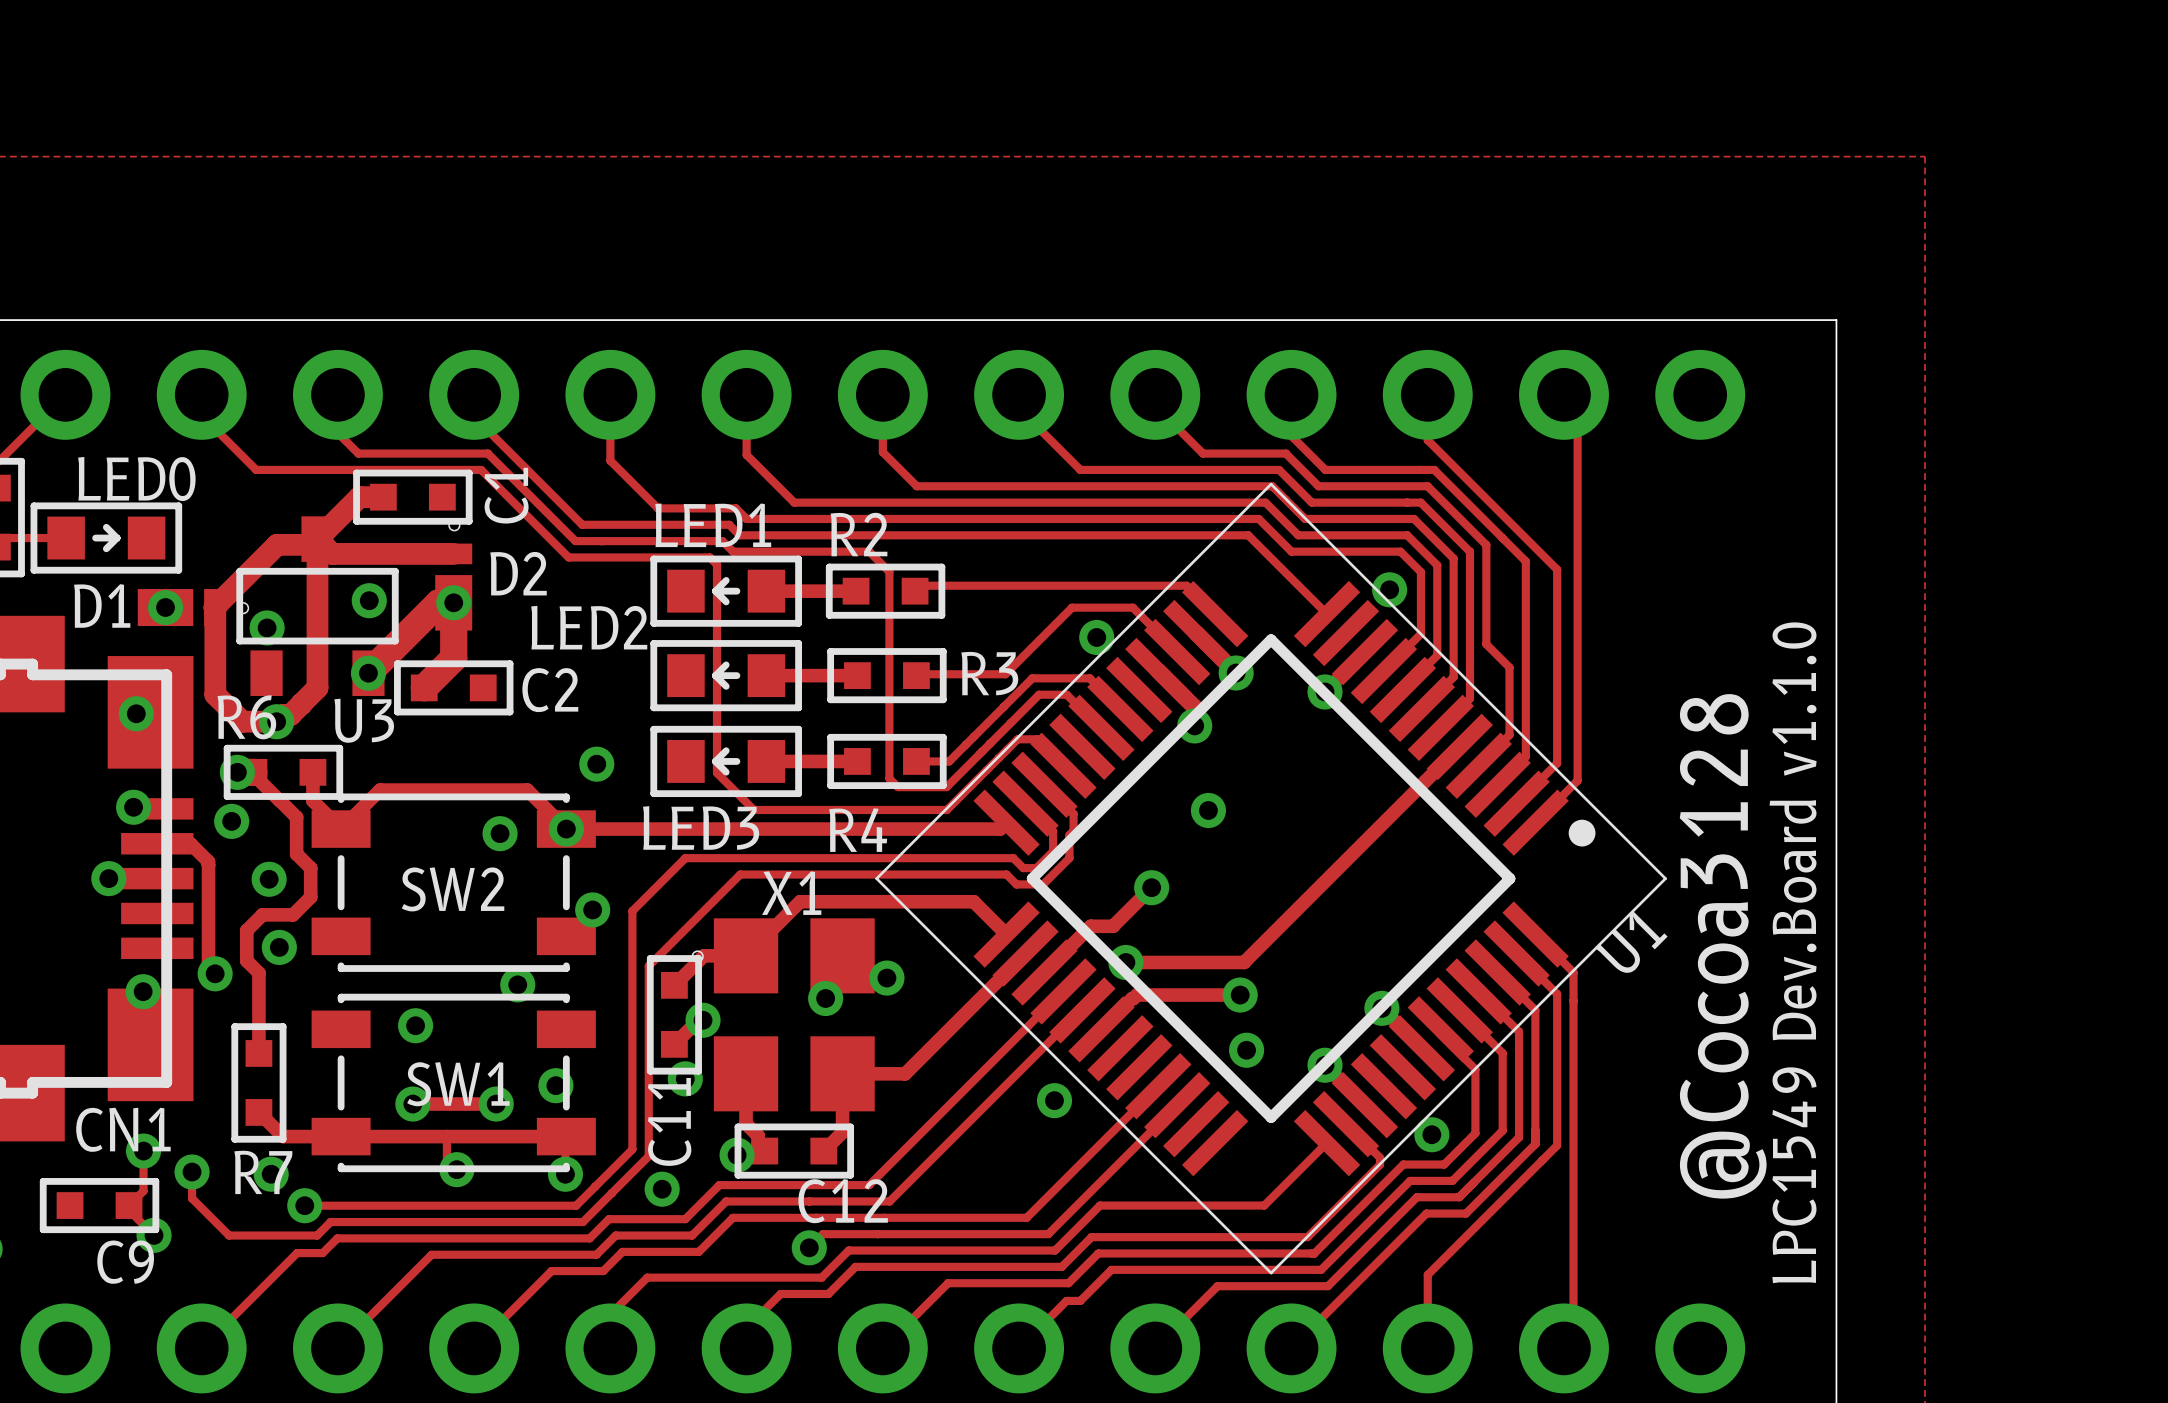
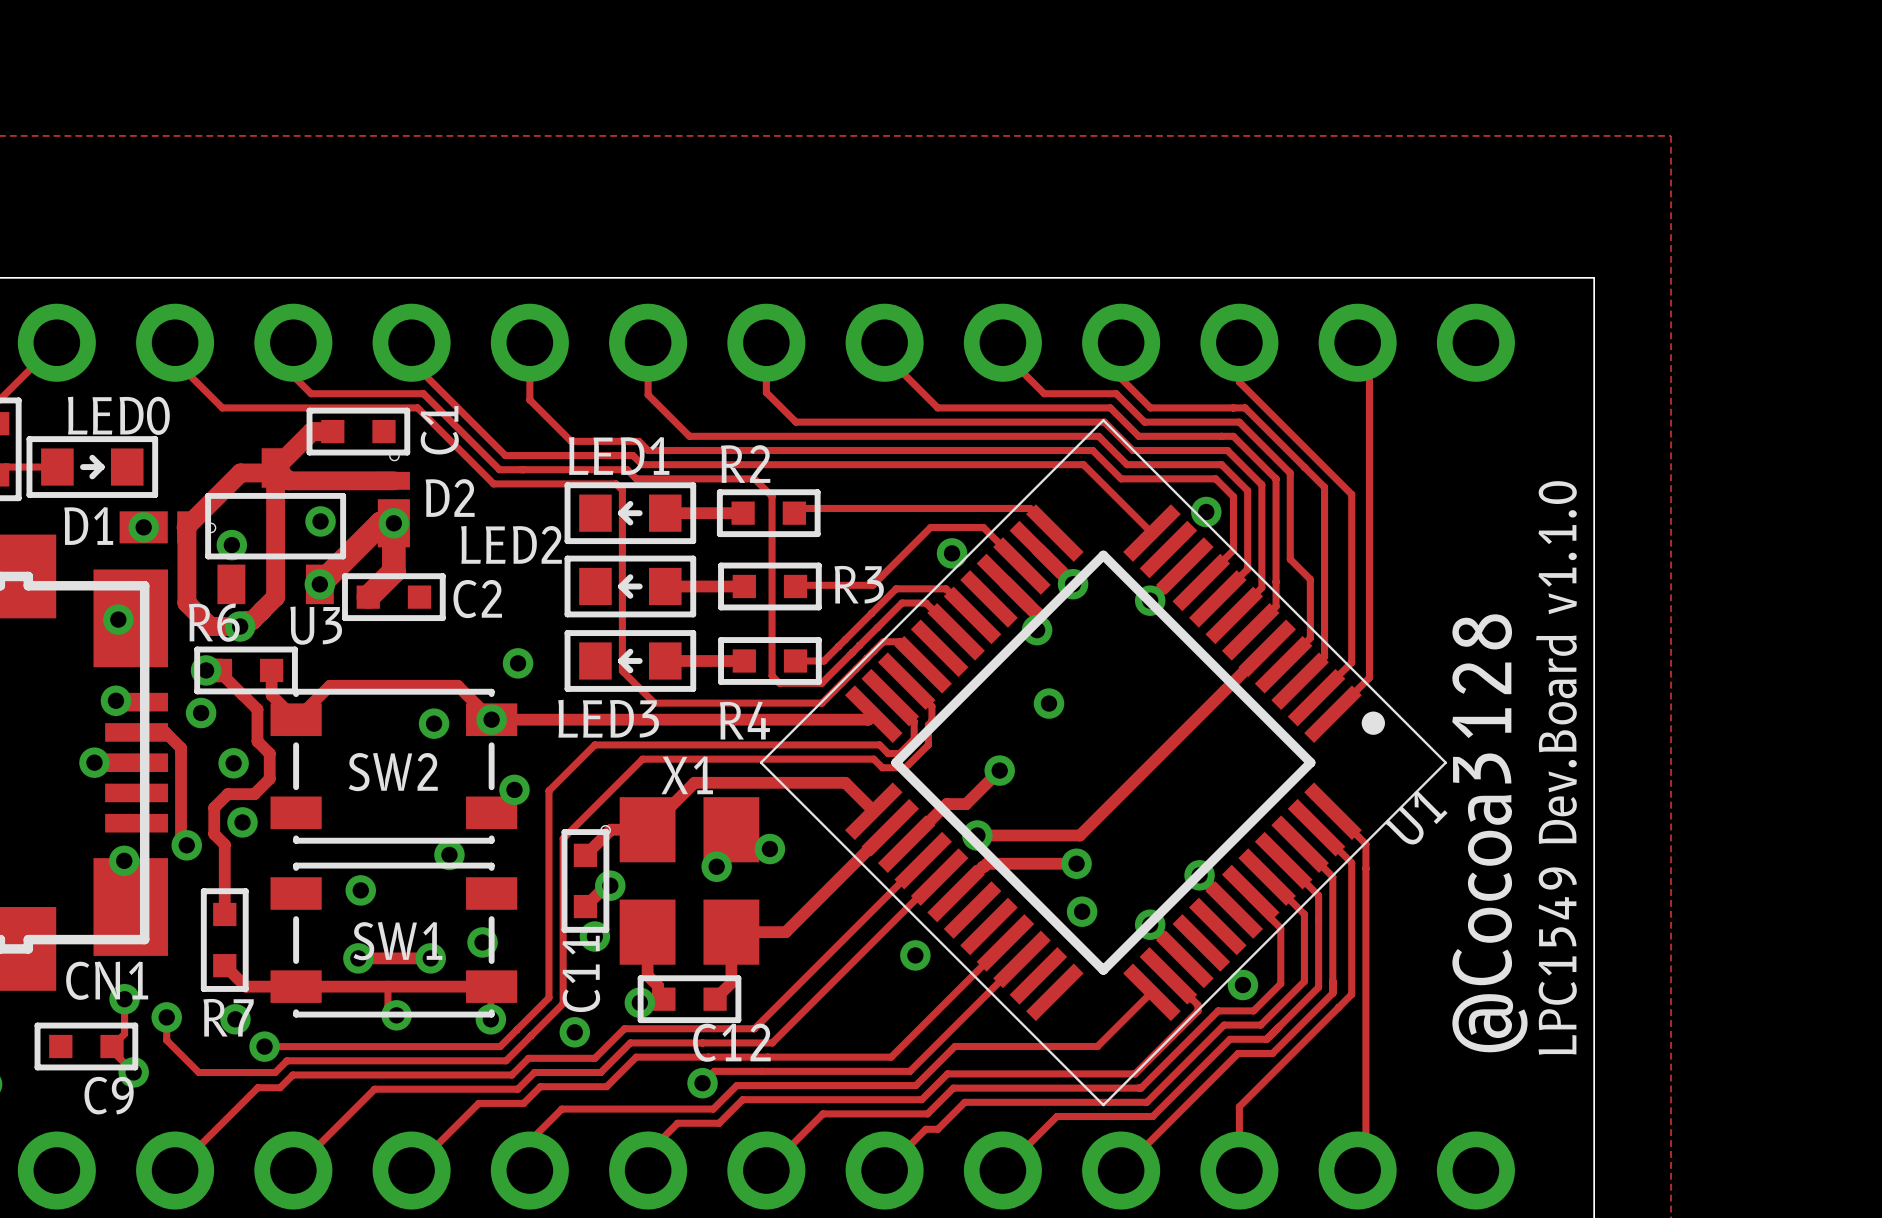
text position: @Cocoa3128 (1723, 946) -> @Cocoa3128 (1489, 833)
text position: LPC1549 Dev.Board v1.1.0 (1793, 952) -> LPC1549 Dev.Board v1.1.0 (1556, 767)

